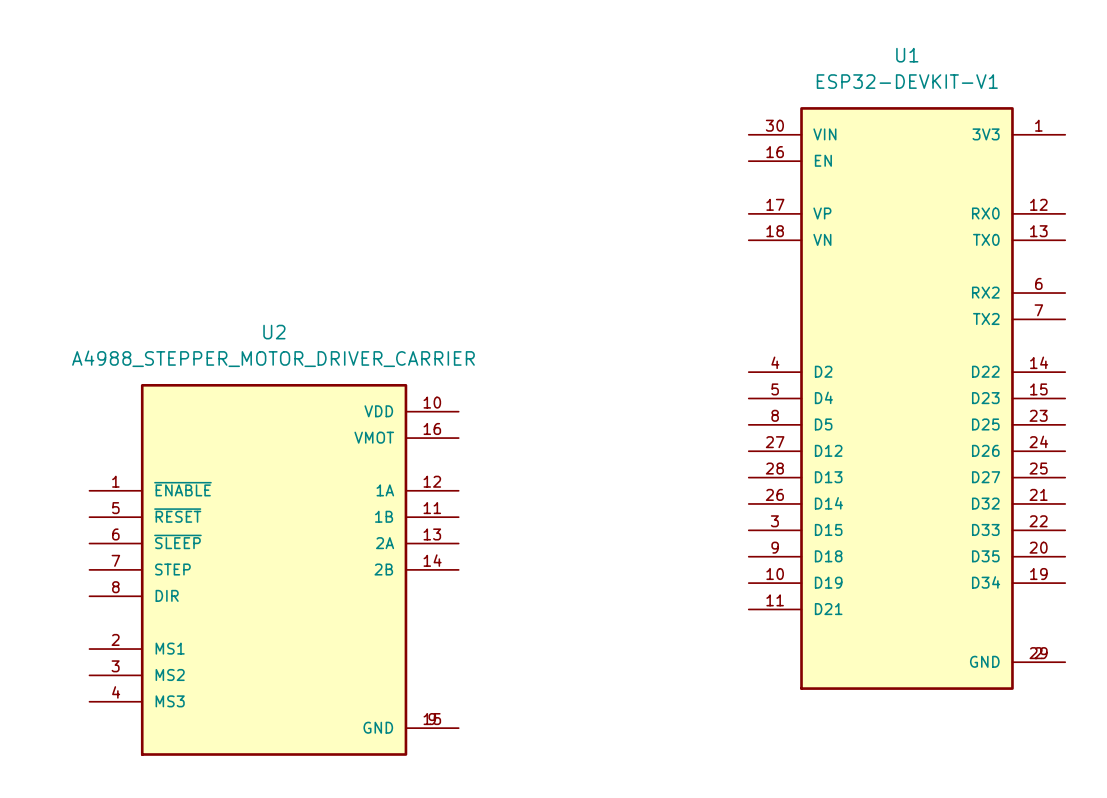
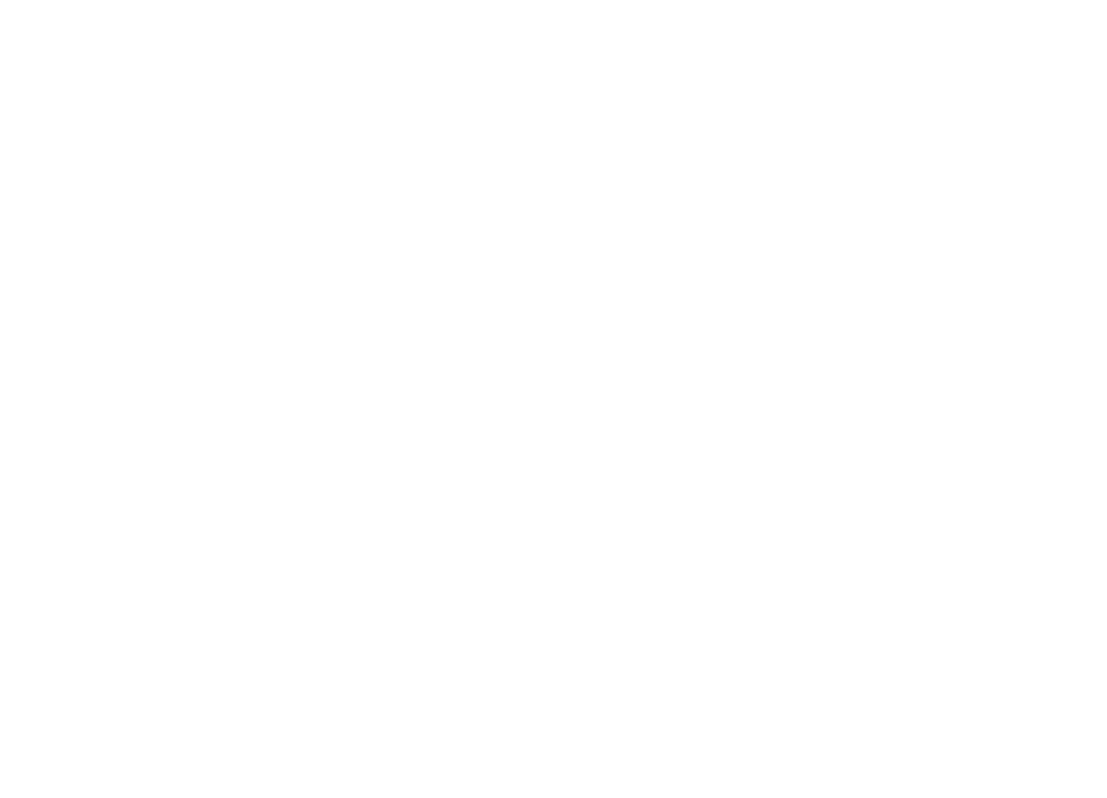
U1: ESP32-DEVKIT-V1 (906, 398) -> none
U2: A4988_STEPPER_MOTOR_DRIVER_CARRIER (274, 569) -> none

